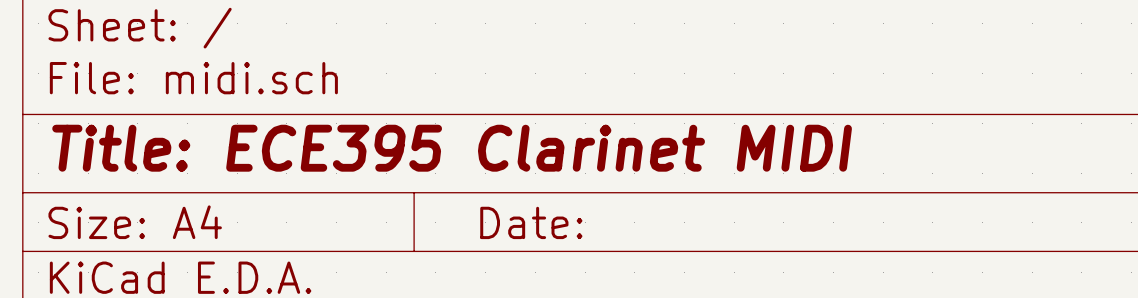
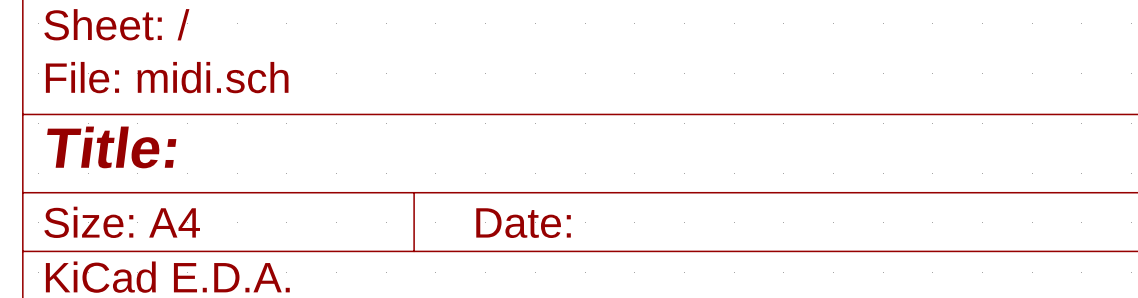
title block: Title: ECE395 Clarinet MIDI (452, 148) -> Title: (111, 147)

